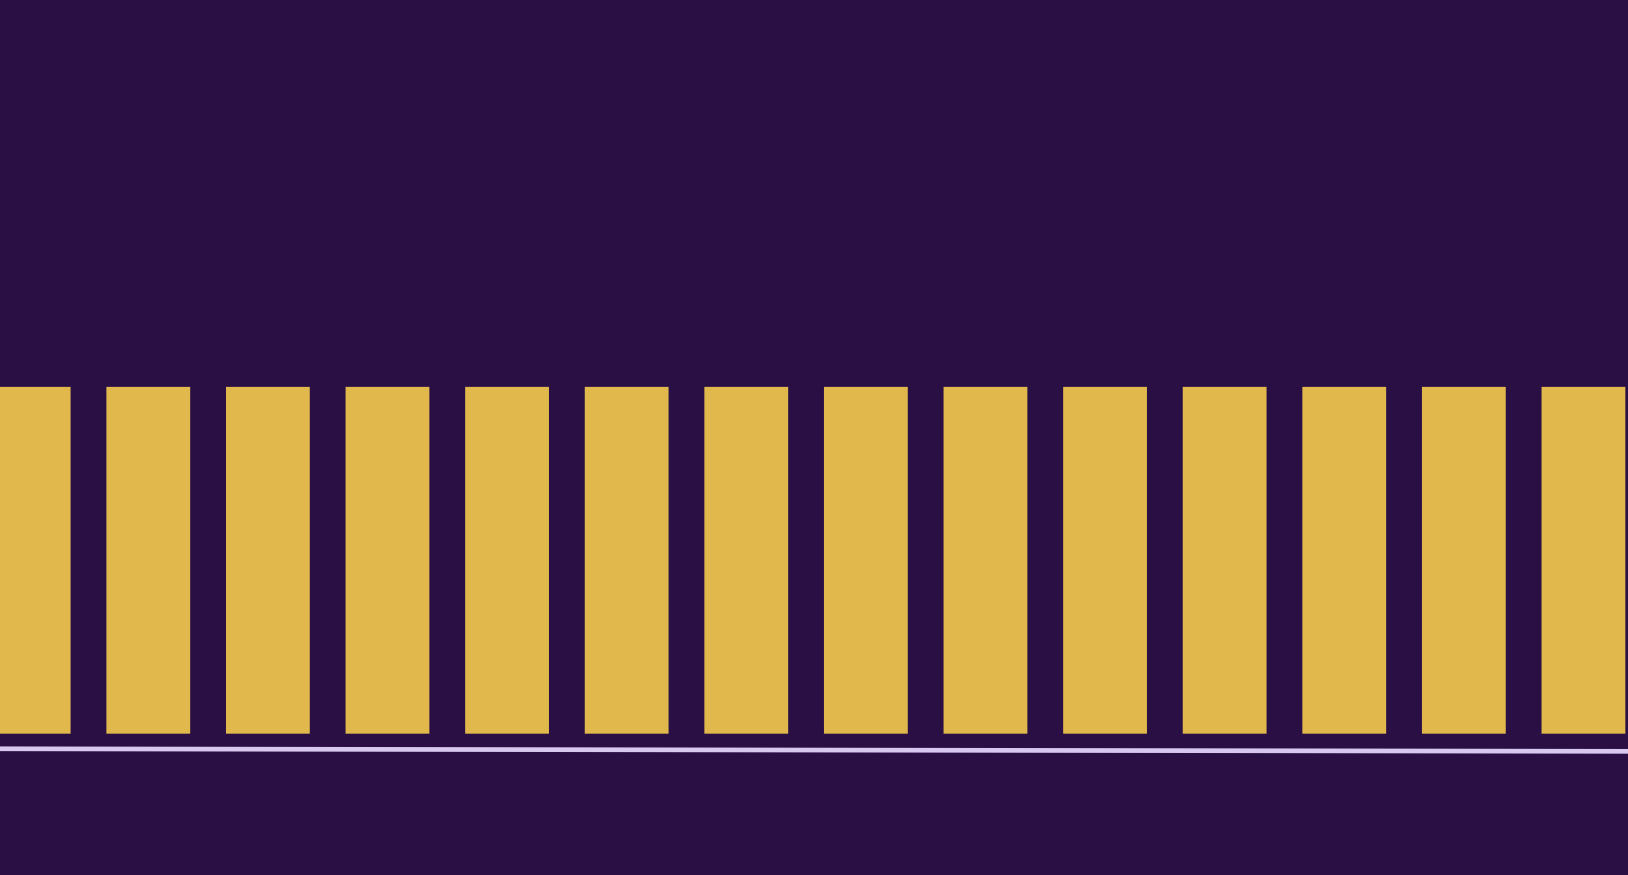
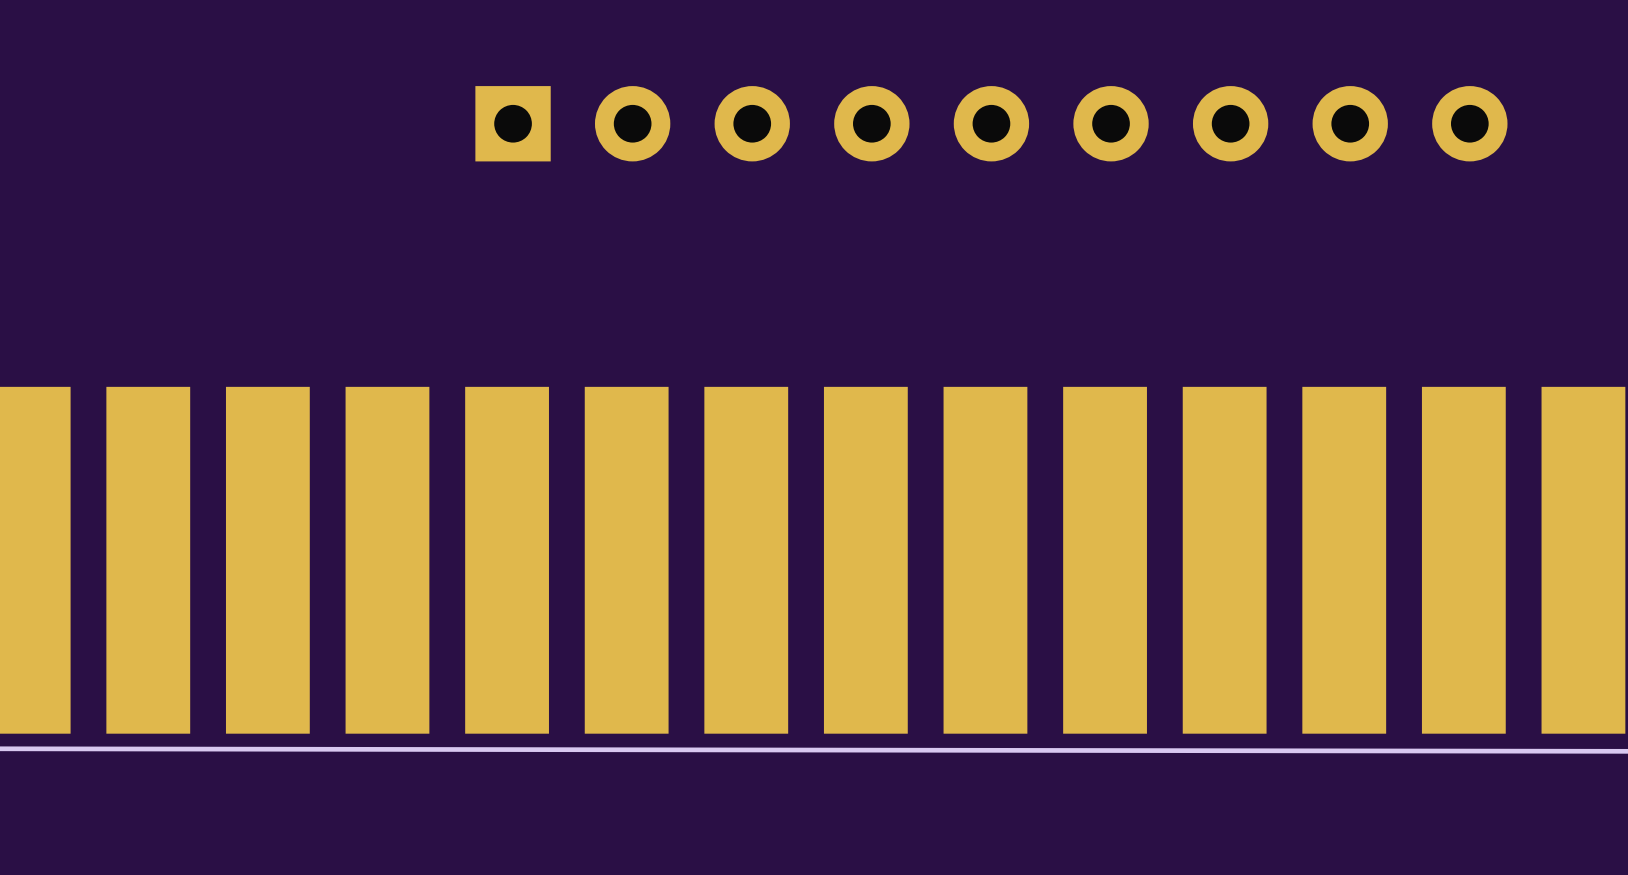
part: none -> (991, 123)

